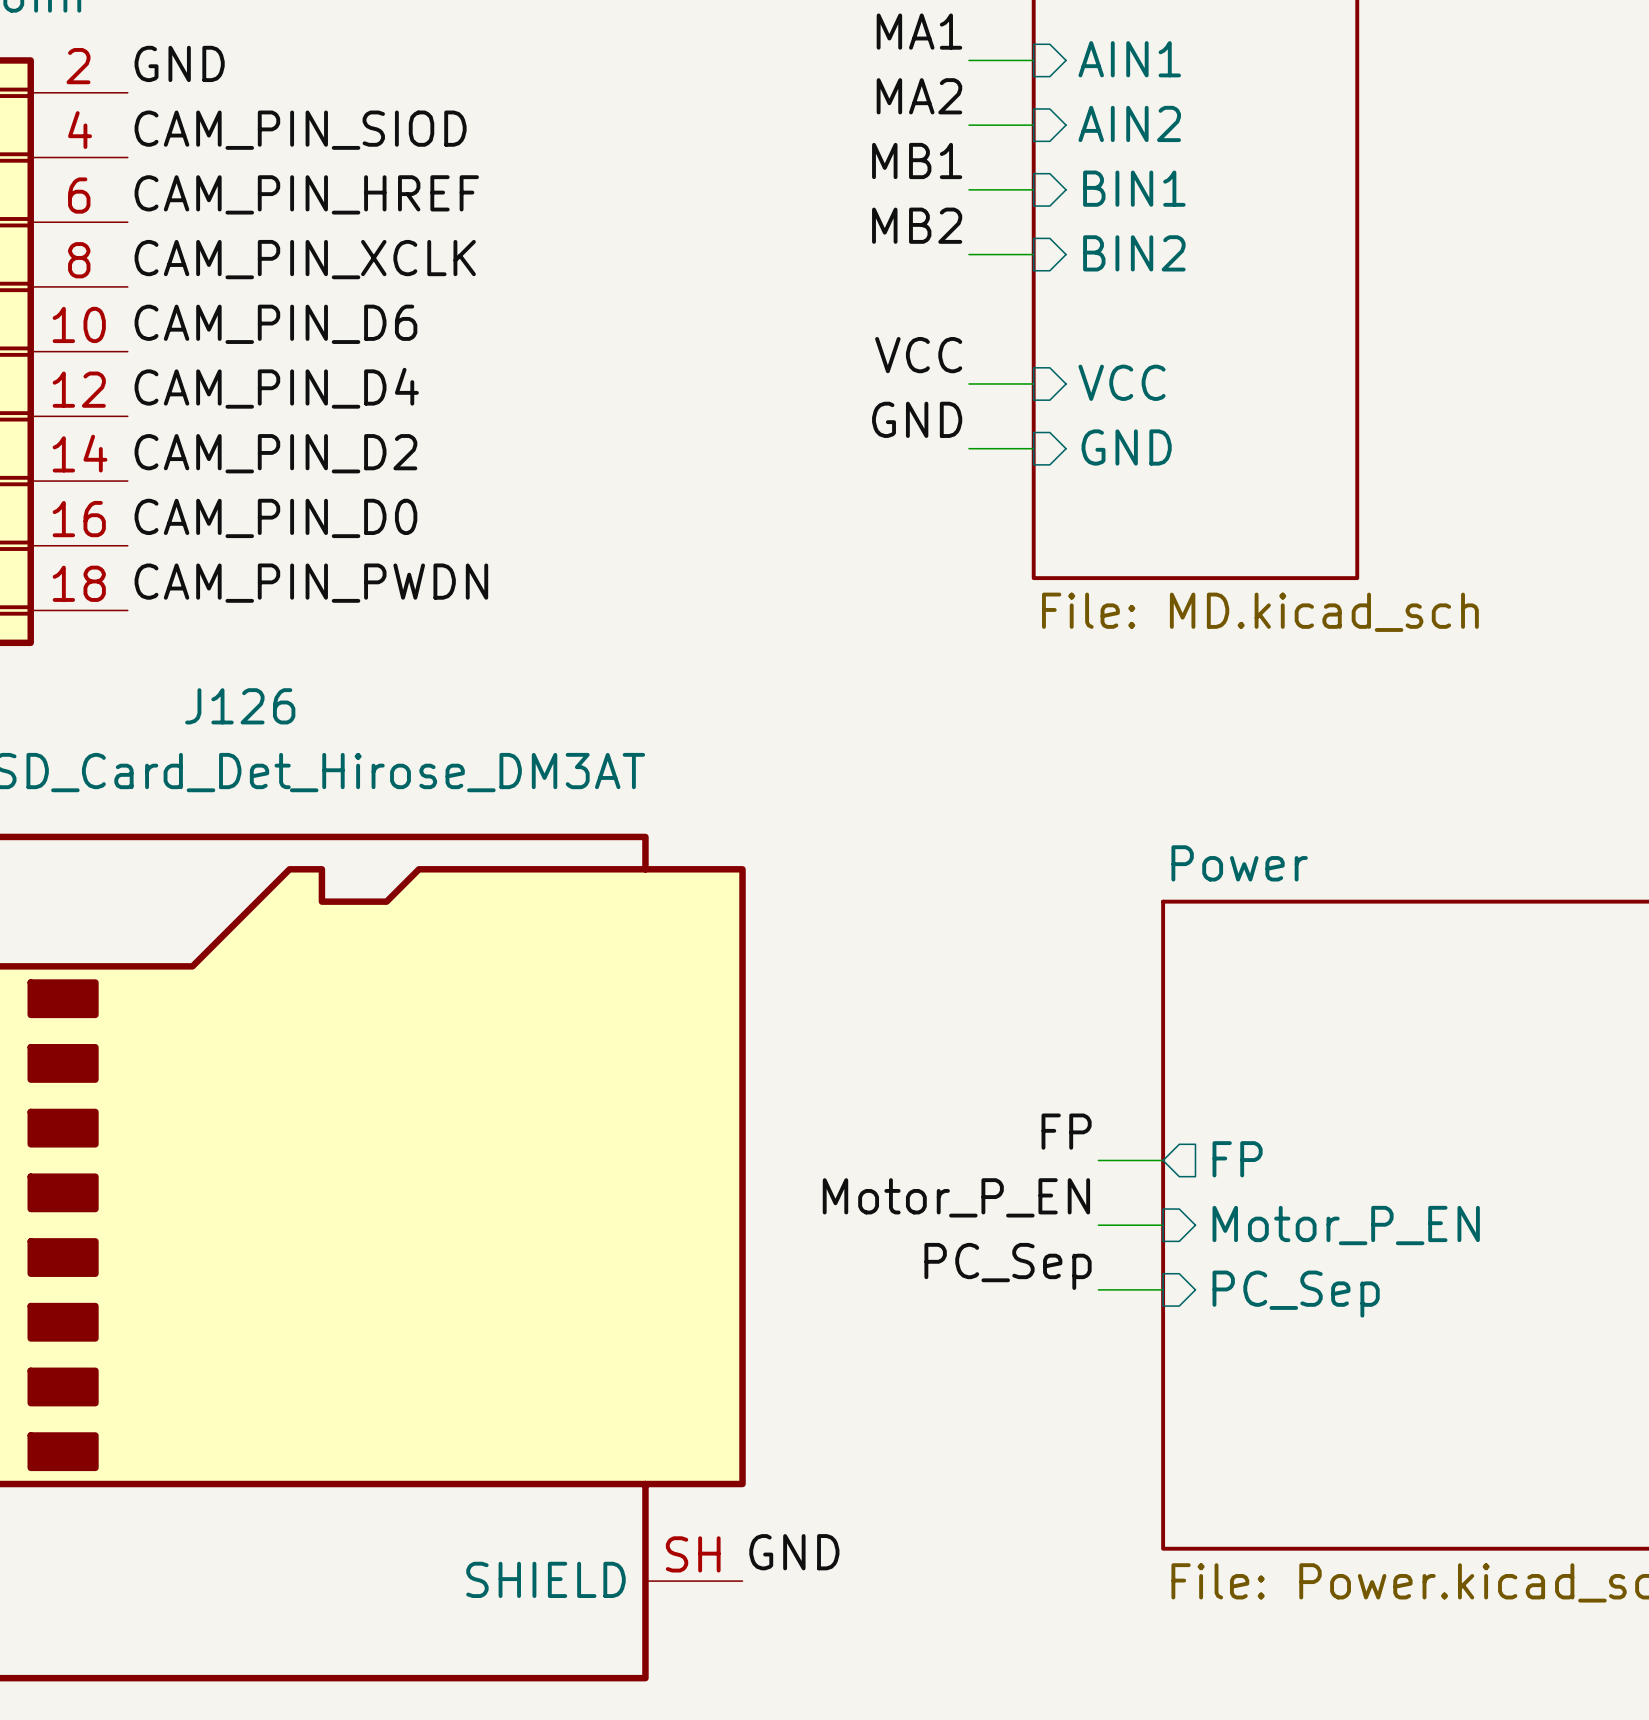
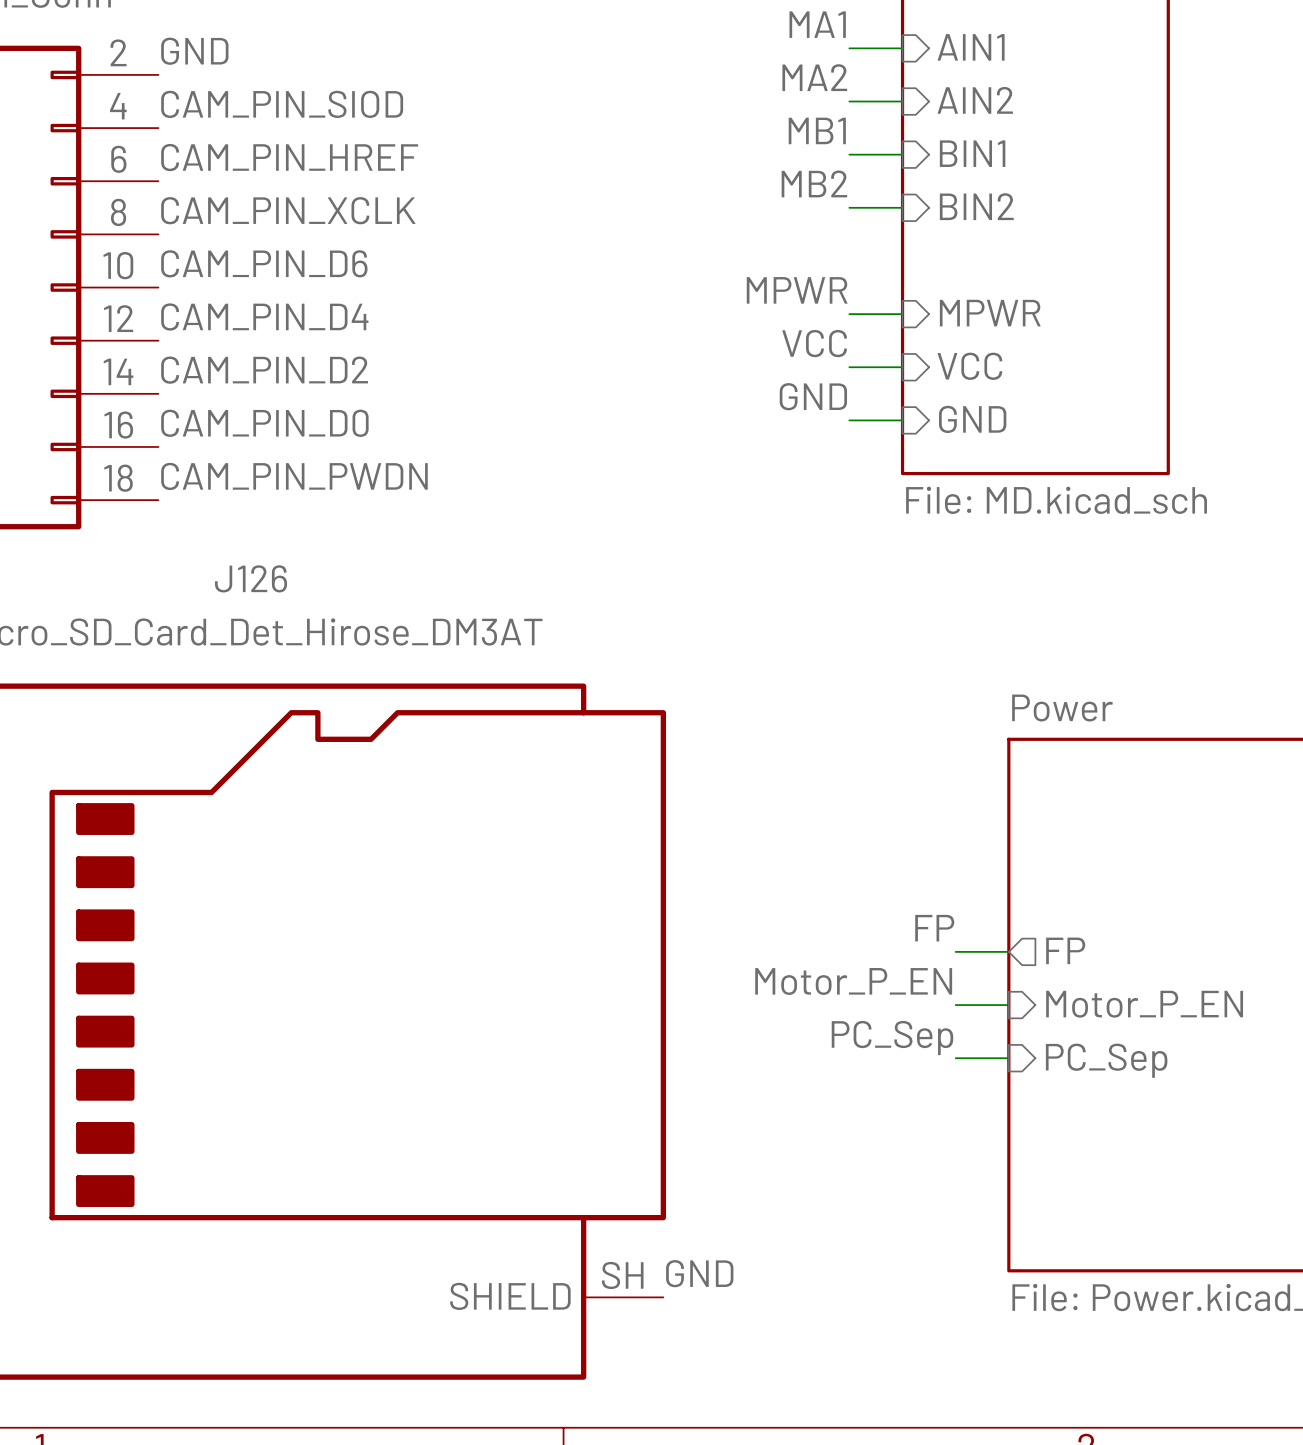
label: VCC (918, 355) -> MPWR (797, 290)
sheet pin: VCC (1122, 382) -> MPWR (990, 313)
label: GND (917, 419) -> VCC (814, 343)
sheet pin: GND (1126, 447) -> VCC (969, 366)
label: none -> GND (813, 396)
sheet pin: none -> GND (972, 419)
wire: none -> (849, 420) (902, 420)

